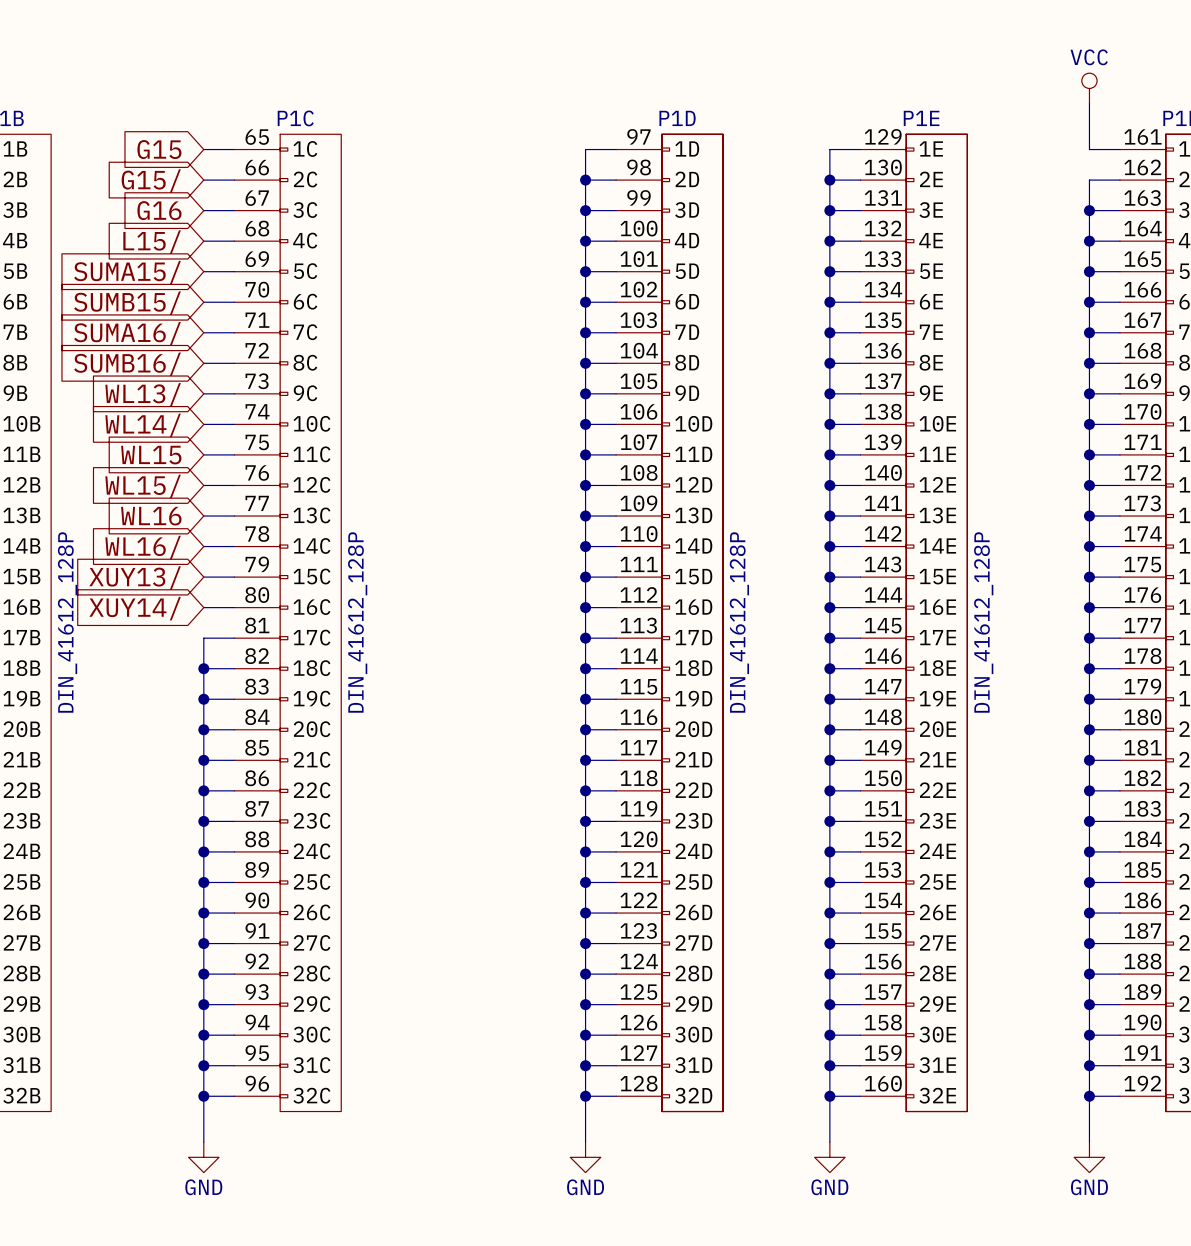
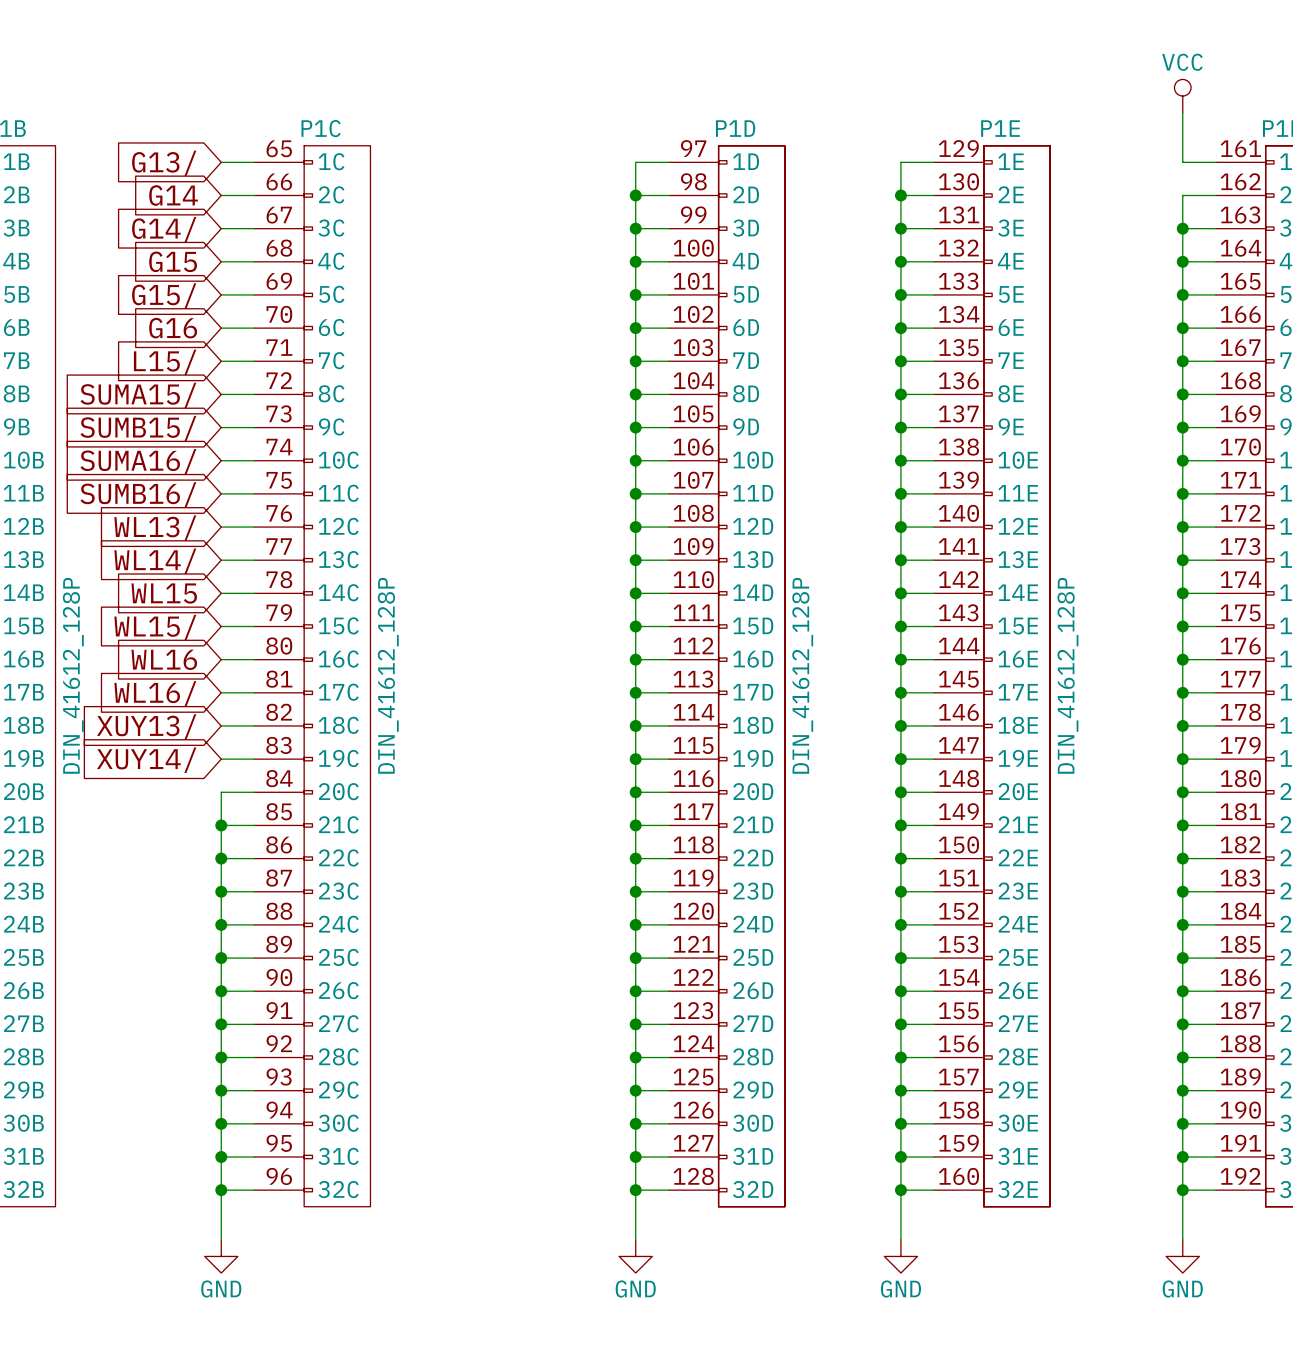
global label: G15 (159, 149) -> G13/ (164, 163)
global label: G15/ (151, 181) -> G14 (173, 195)
global label: G16 (159, 210) -> G14/ (164, 229)
global label: L15/ (152, 242) -> G15 (173, 261)
global label: SUMA15/ (127, 272) -> G15/ (164, 296)
global label: SUMB15/ (127, 303) -> G16 (173, 328)
global label: SUMA16/ (127, 333) -> L15/ (165, 362)
global label: SUMB16/ (127, 364) -> SUMA15/ (138, 395)
global label: WL13/ (143, 394) -> SUMB15/ (138, 428)
global label: WL14/ (143, 425) -> SUMA16/ (138, 461)
global label: WL15 (151, 455) -> SUMB16/ (138, 494)
global label: WL15/ (143, 486) -> WL13/ (155, 528)
global label: WL16 (151, 516) -> WL14/ (155, 561)
global label: WL16/ (143, 547) -> WL15 (164, 593)
global label: XUY13/ (135, 578) -> WL15/ (155, 627)
global label: XUY14/ (135, 608) -> WL16 (164, 659)
wire: (203, 638) (203, 729) -> none
global label: none -> WL16/ (155, 693)
junction: (203, 668) -> none
global label: none -> XUY13/ (146, 727)
junction: (203, 699) -> none
global label: none -> XUY14/ (146, 760)
junction: (203, 729) -> none

